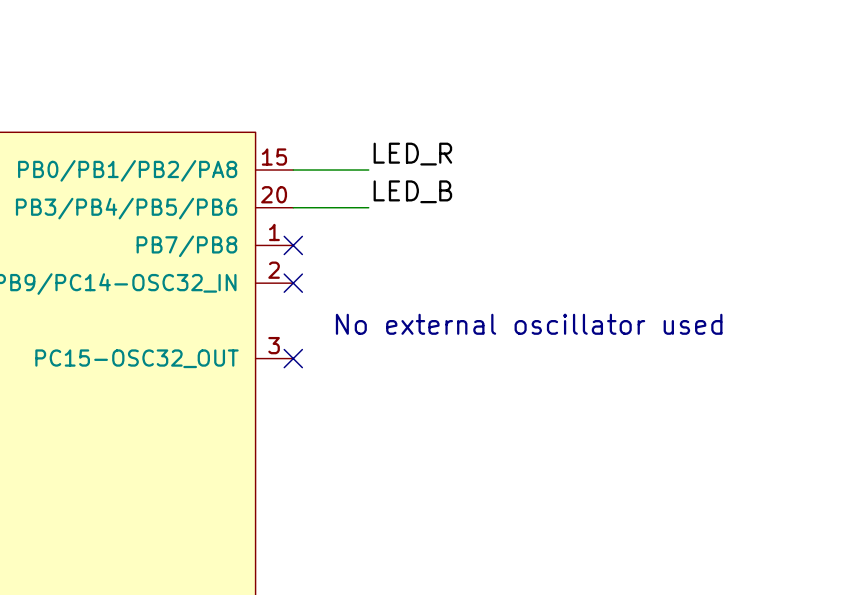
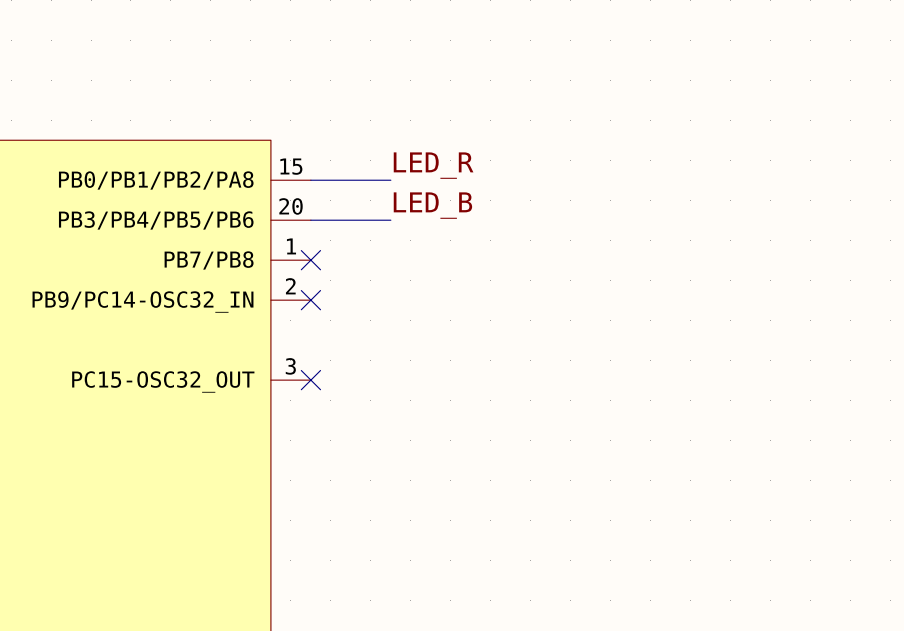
text: No external oscillator used (529, 324) -> none

